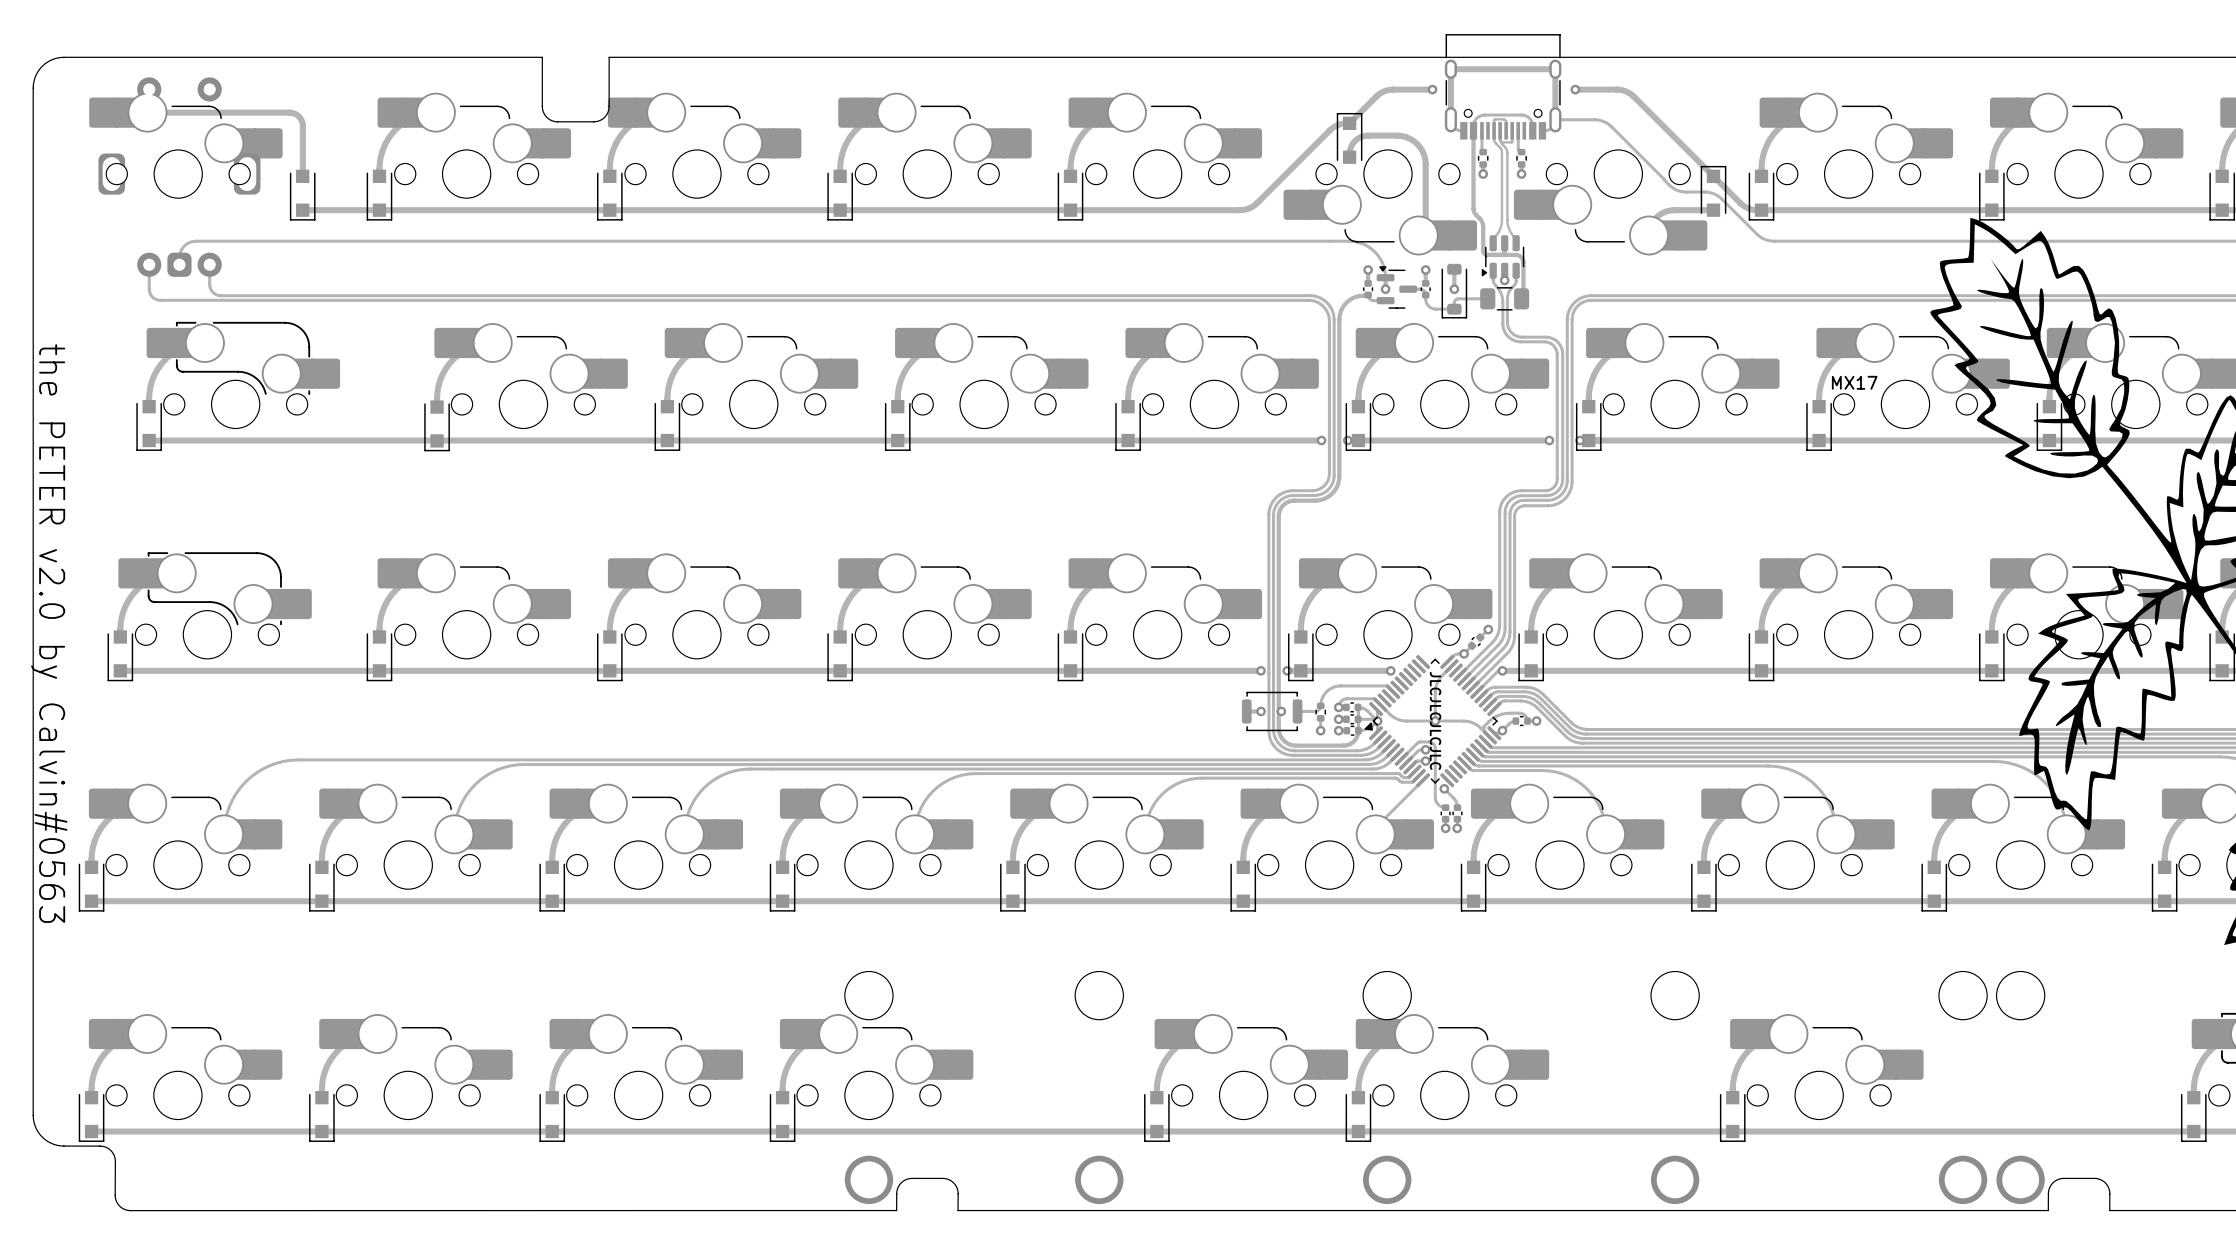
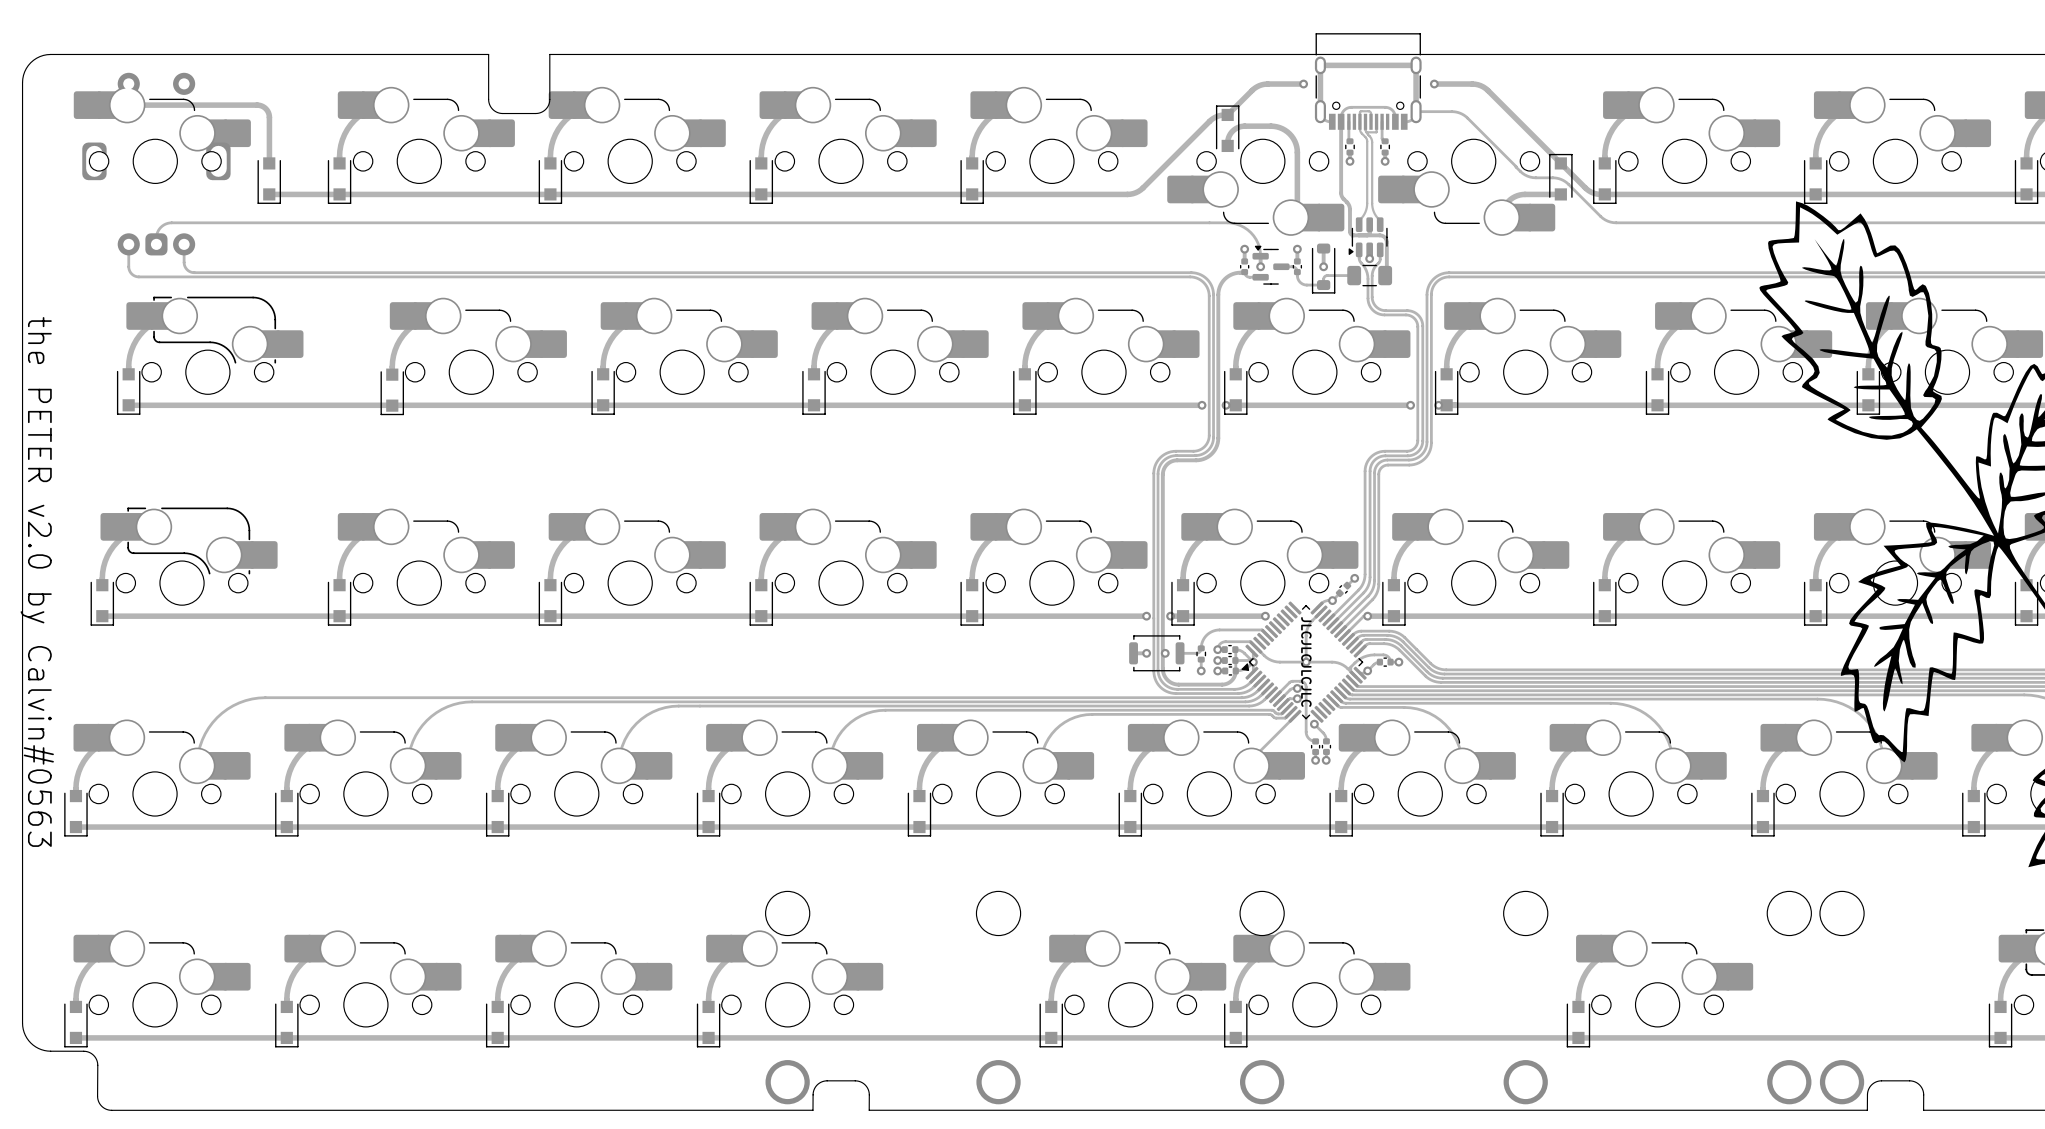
MX17 name: MX17 (1854, 382) -> none

